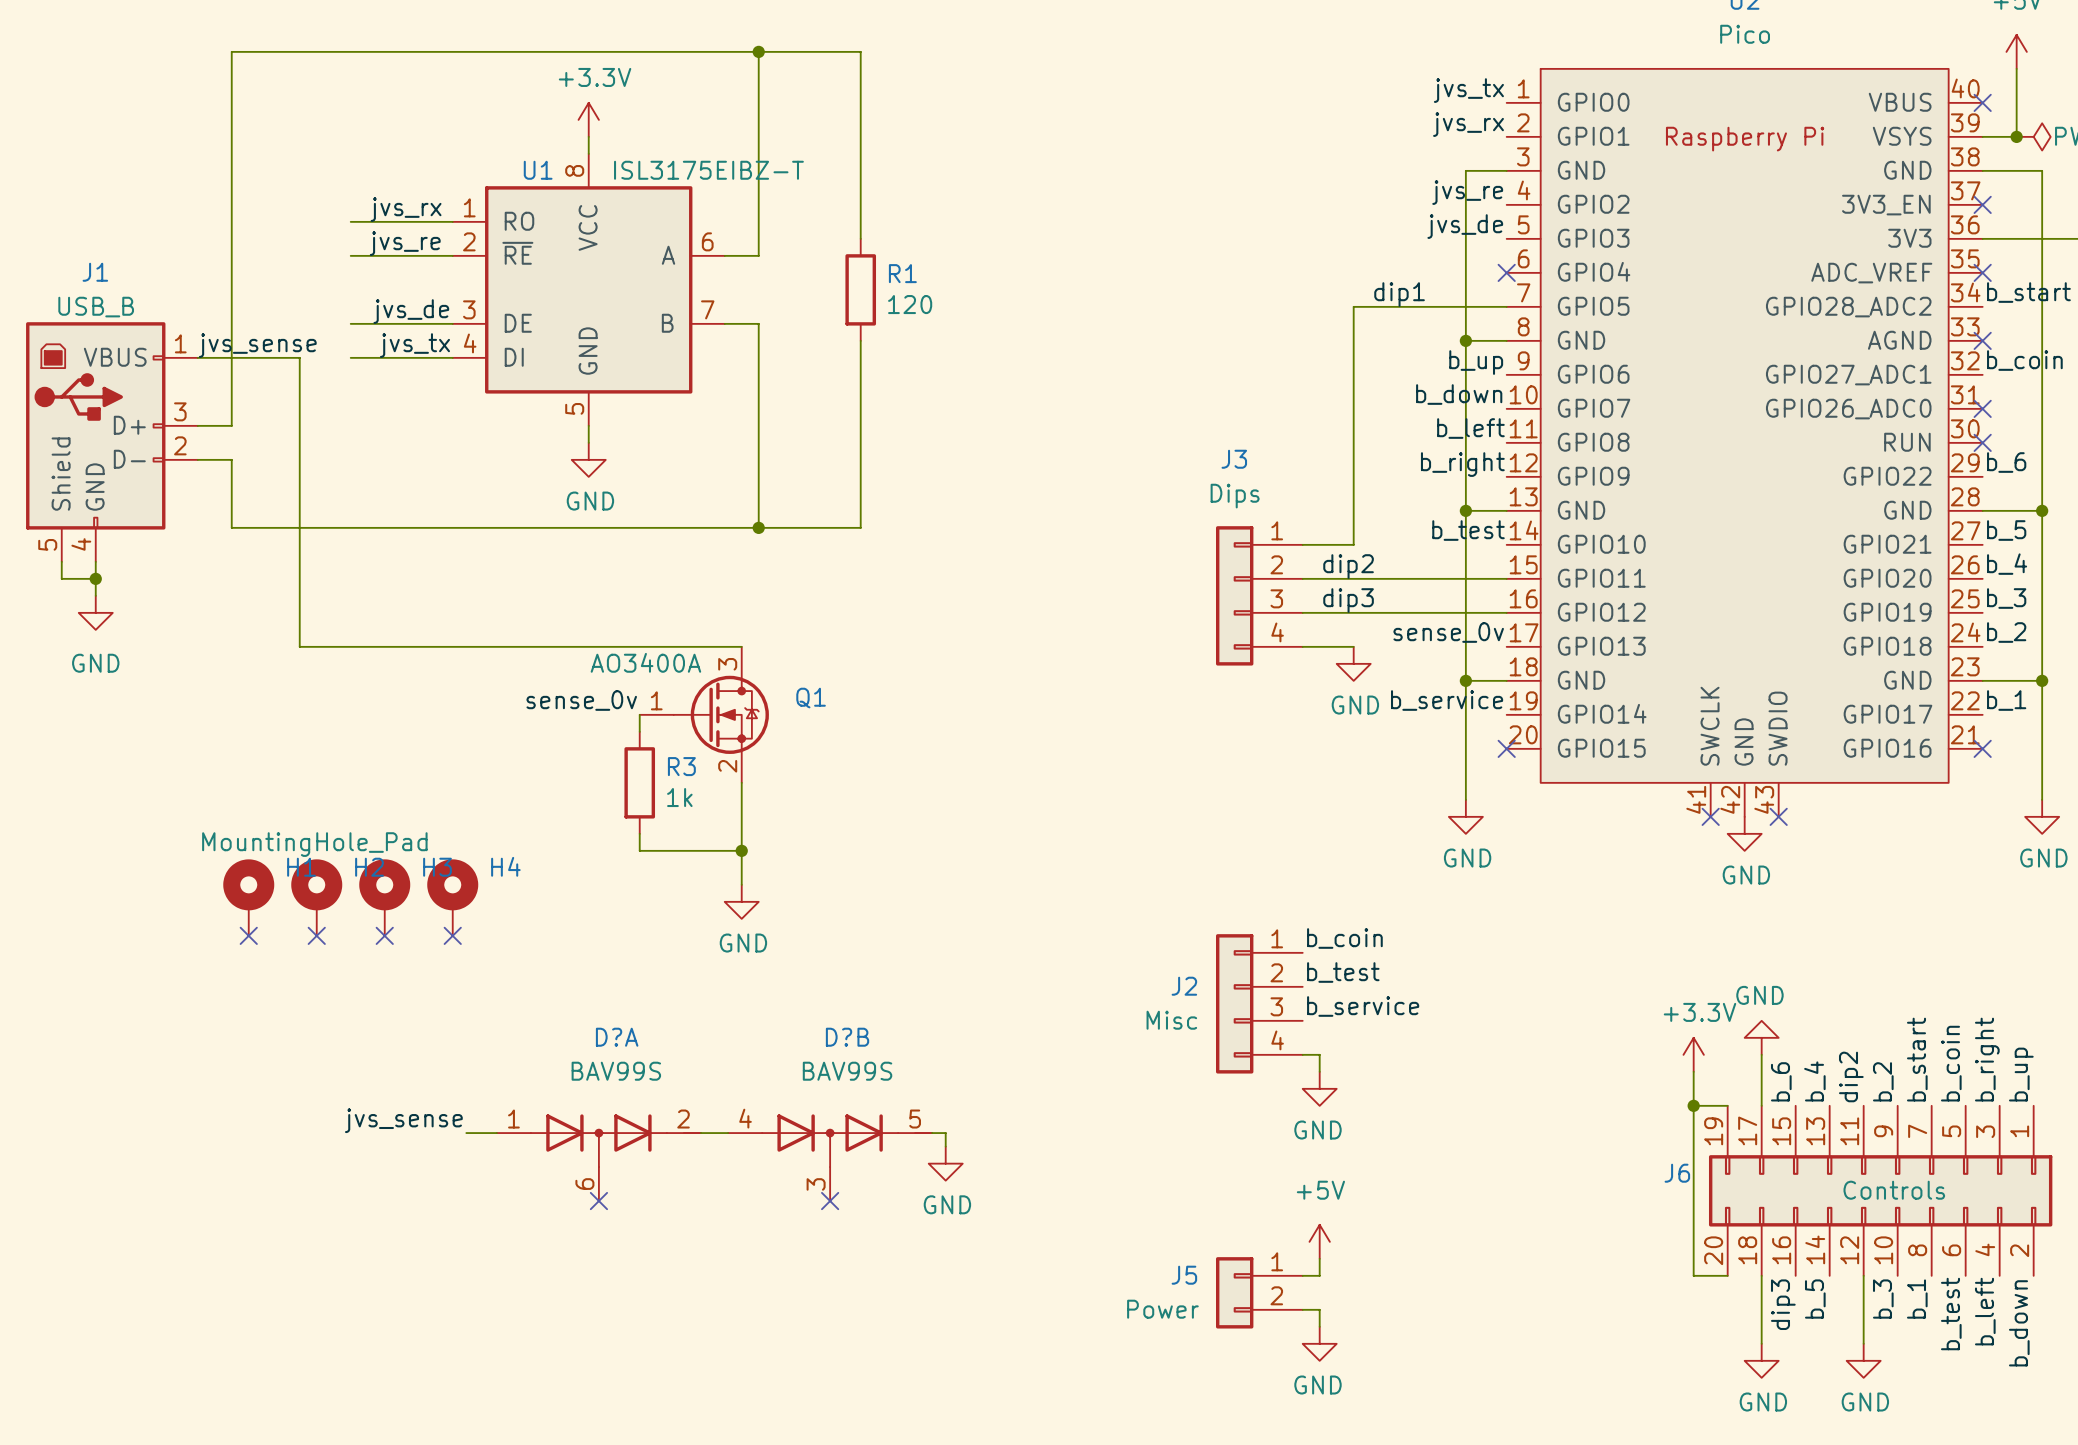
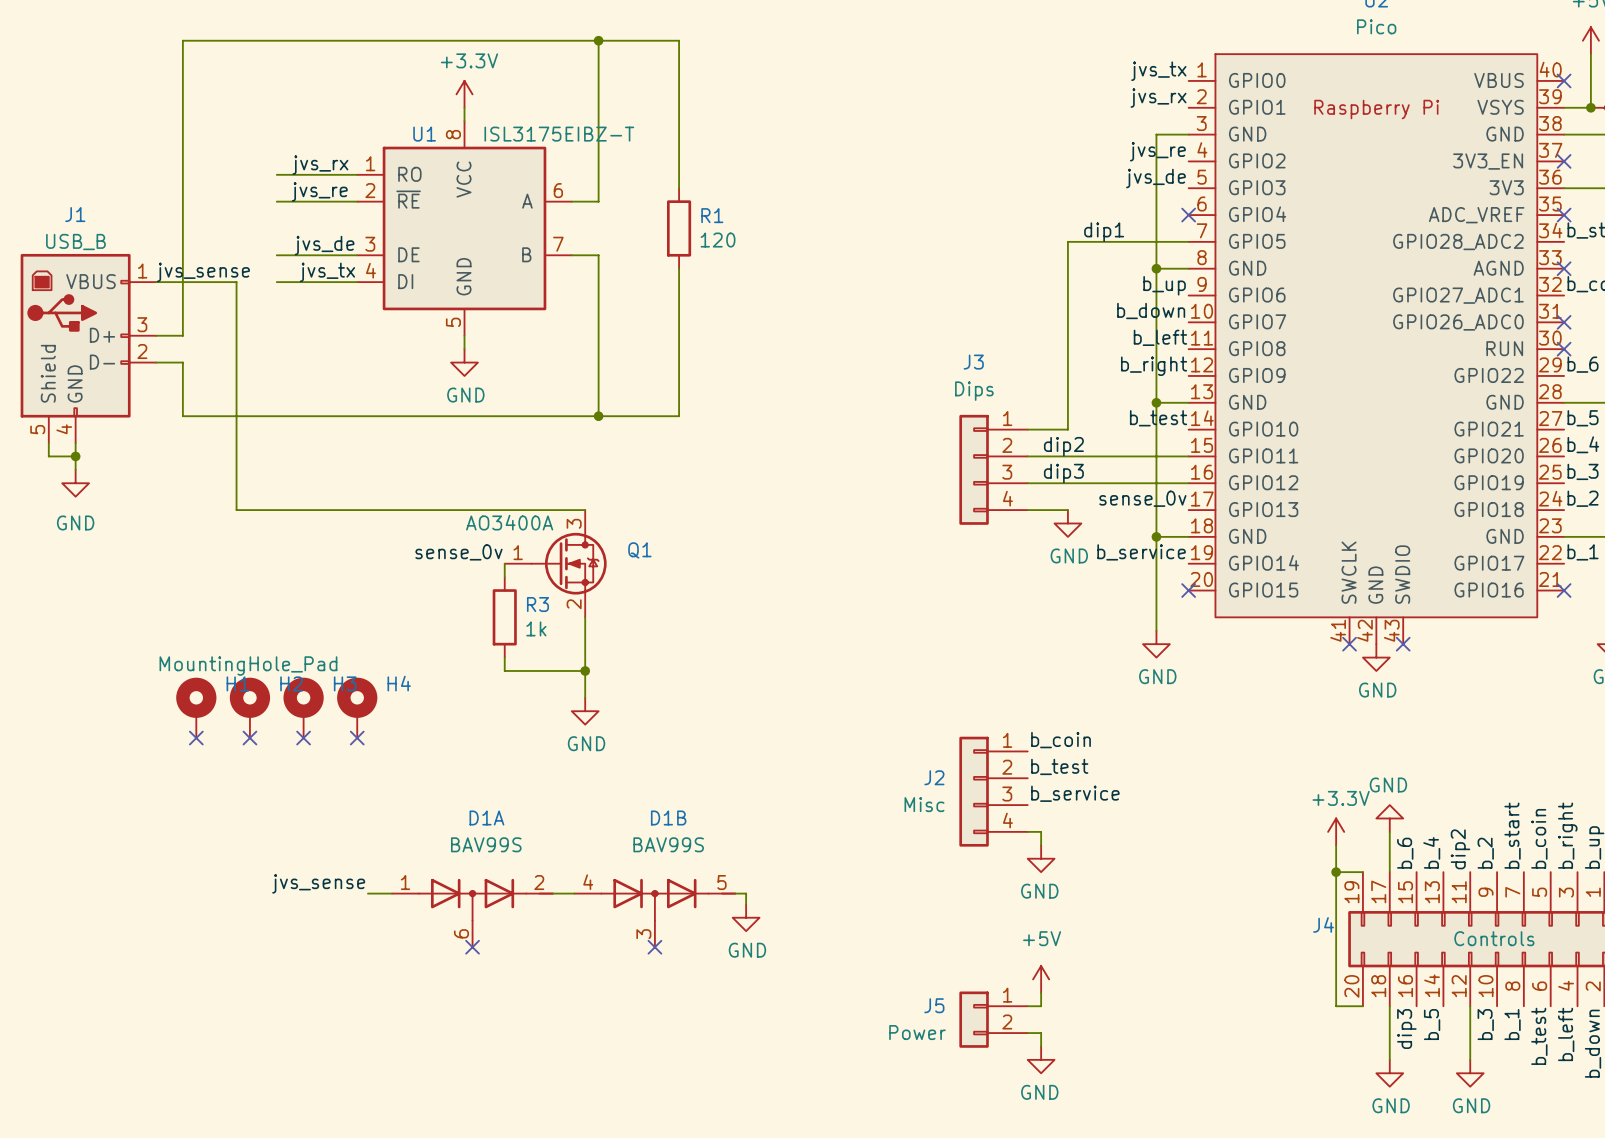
D?A name: D?A (617, 1037) -> D1A (486, 817)
D?B name: D?B (847, 1037) -> D1B (668, 817)
J6 name: J6 (1677, 1173) -> J4 (1323, 924)

